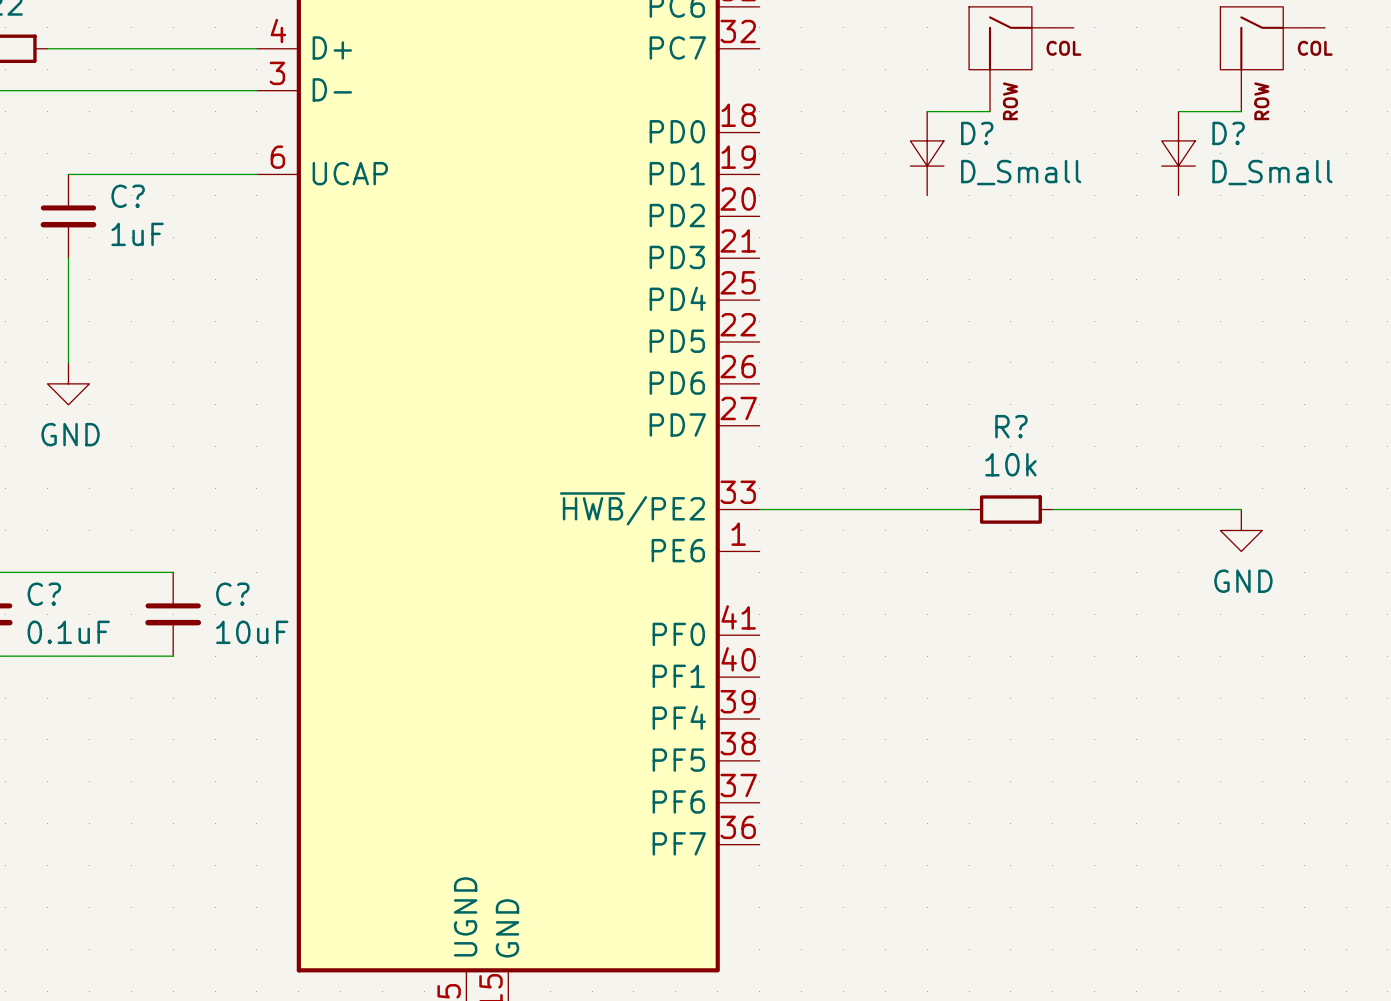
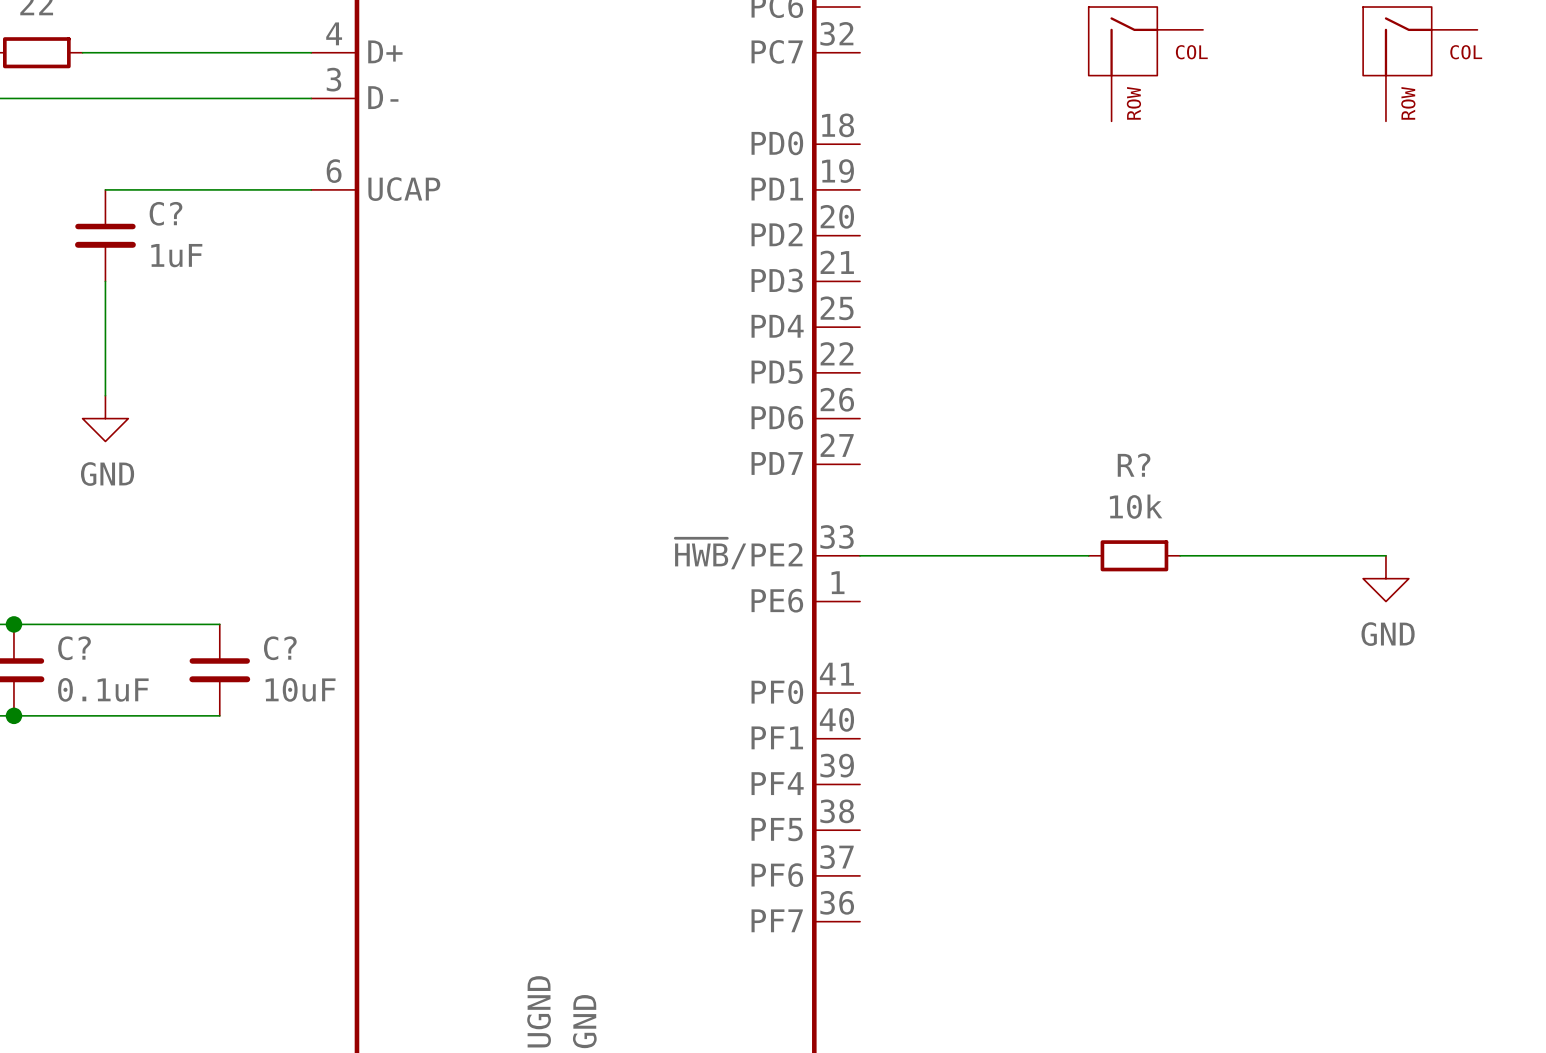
wire: (927, 111) (990, 111) -> none
wire: (1178, 111) (1241, 111) -> none
D?: D_Small (927, 153) -> none
D?: D_Small (1178, 153) -> none

